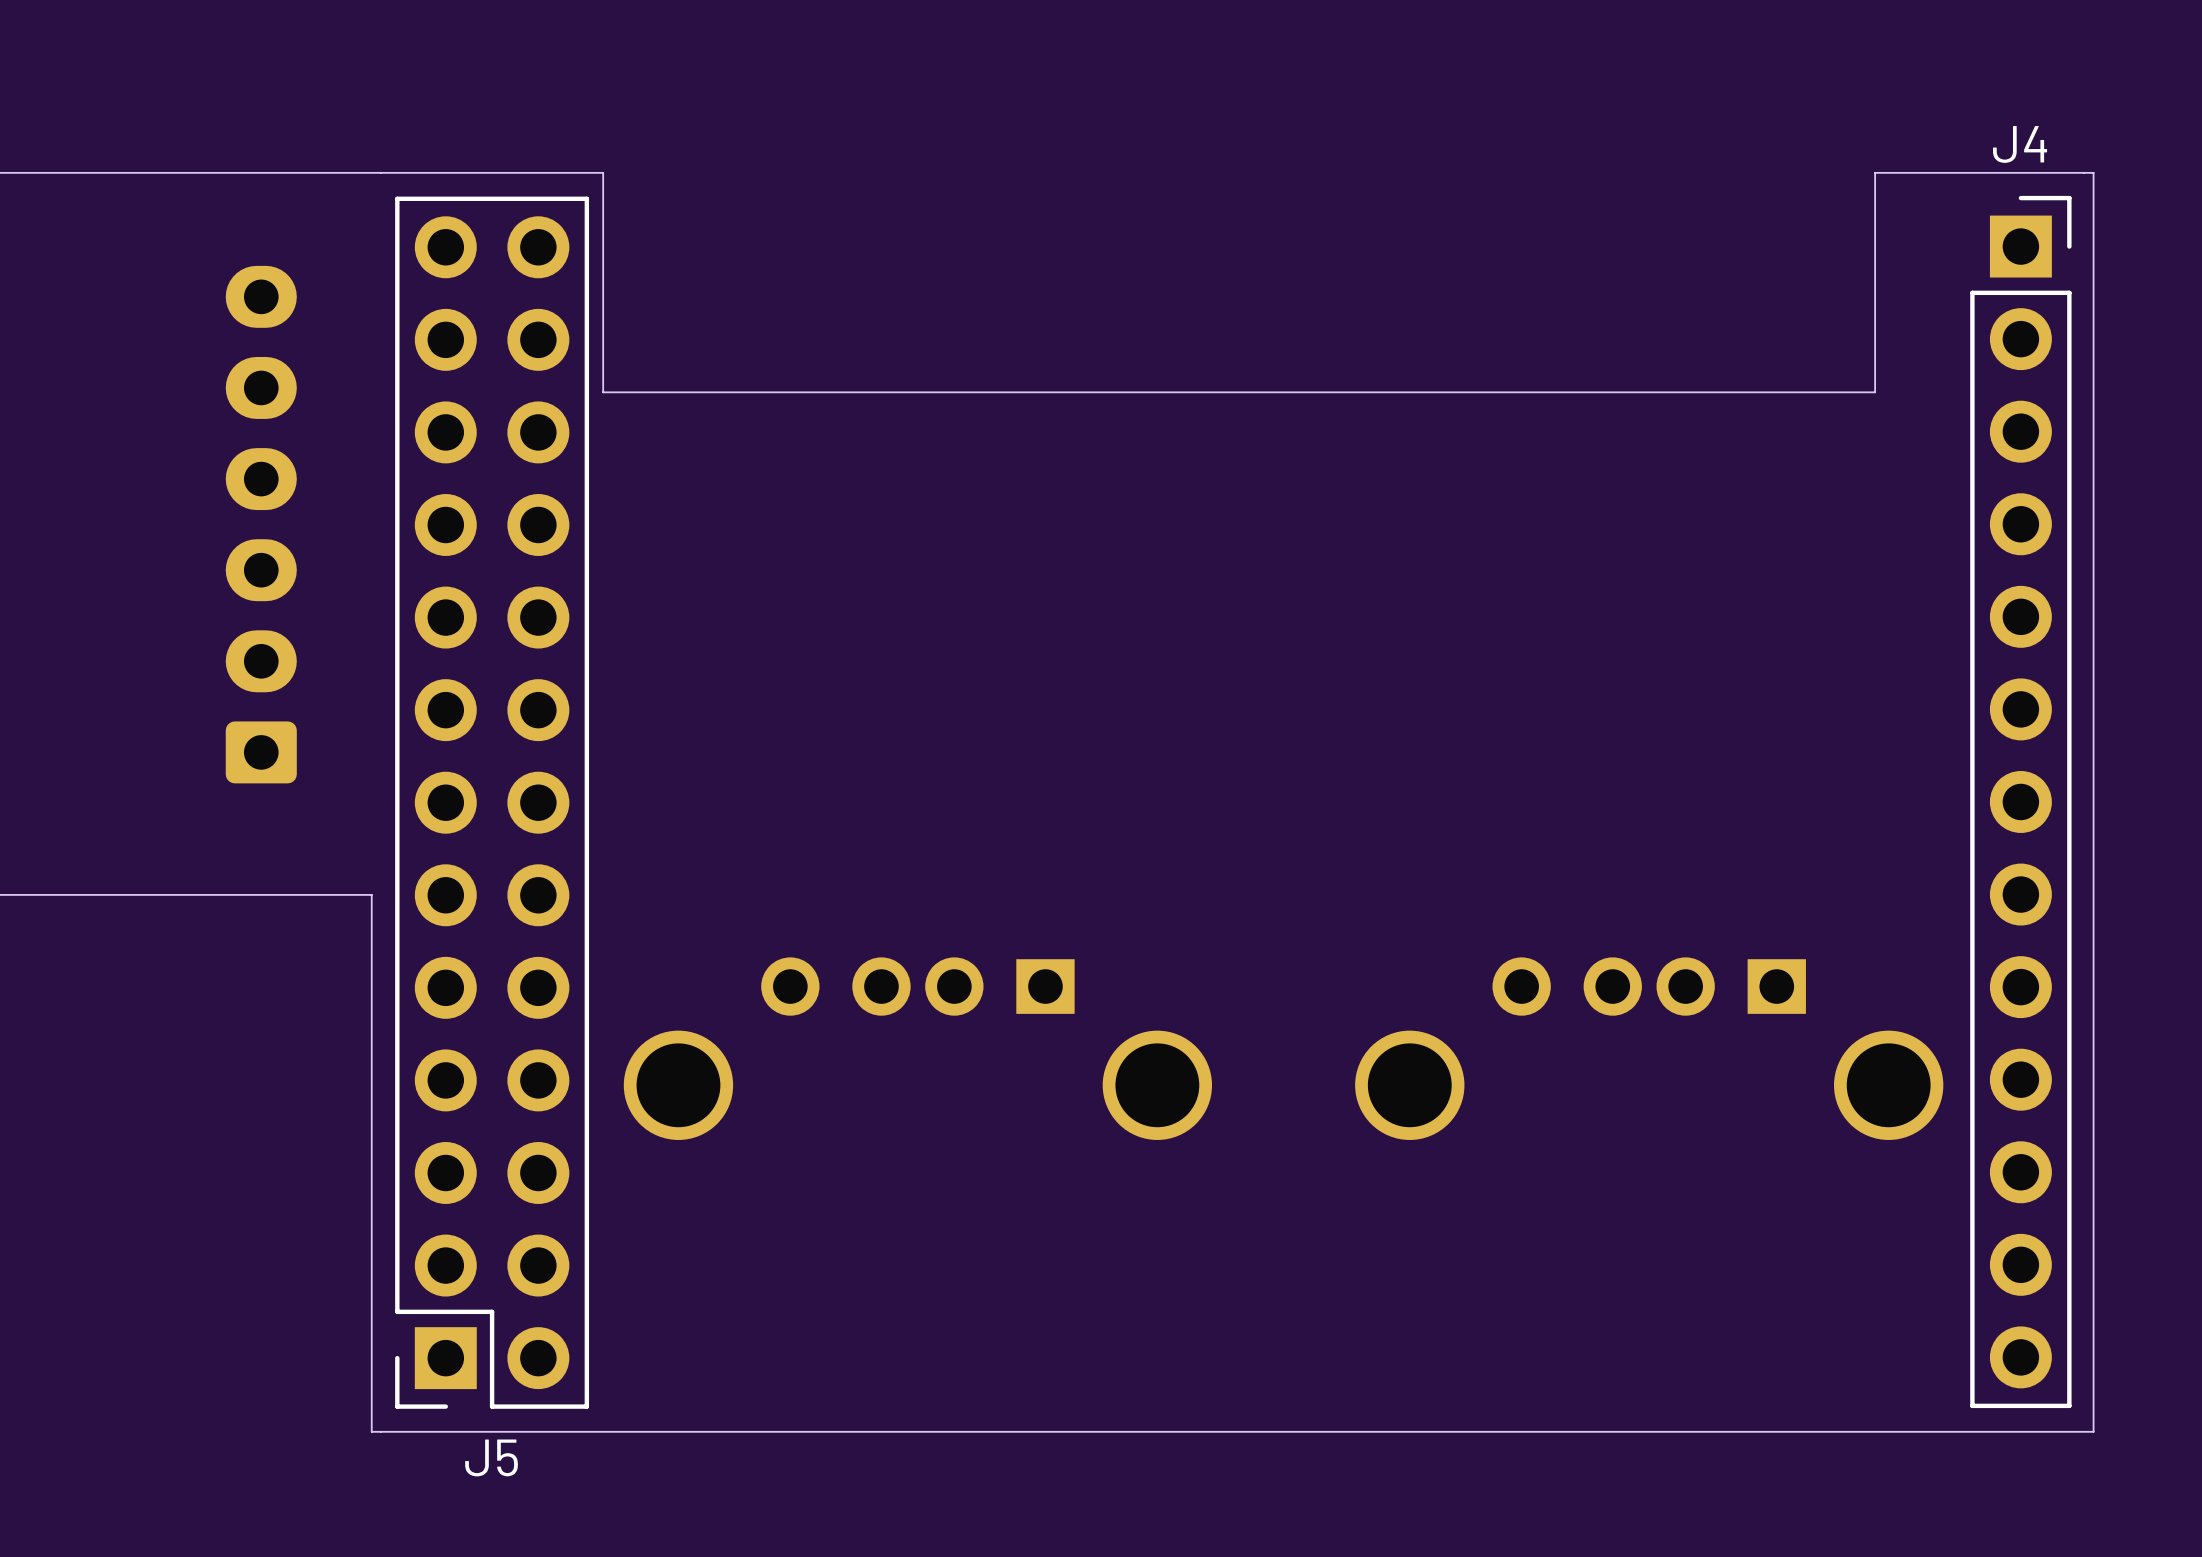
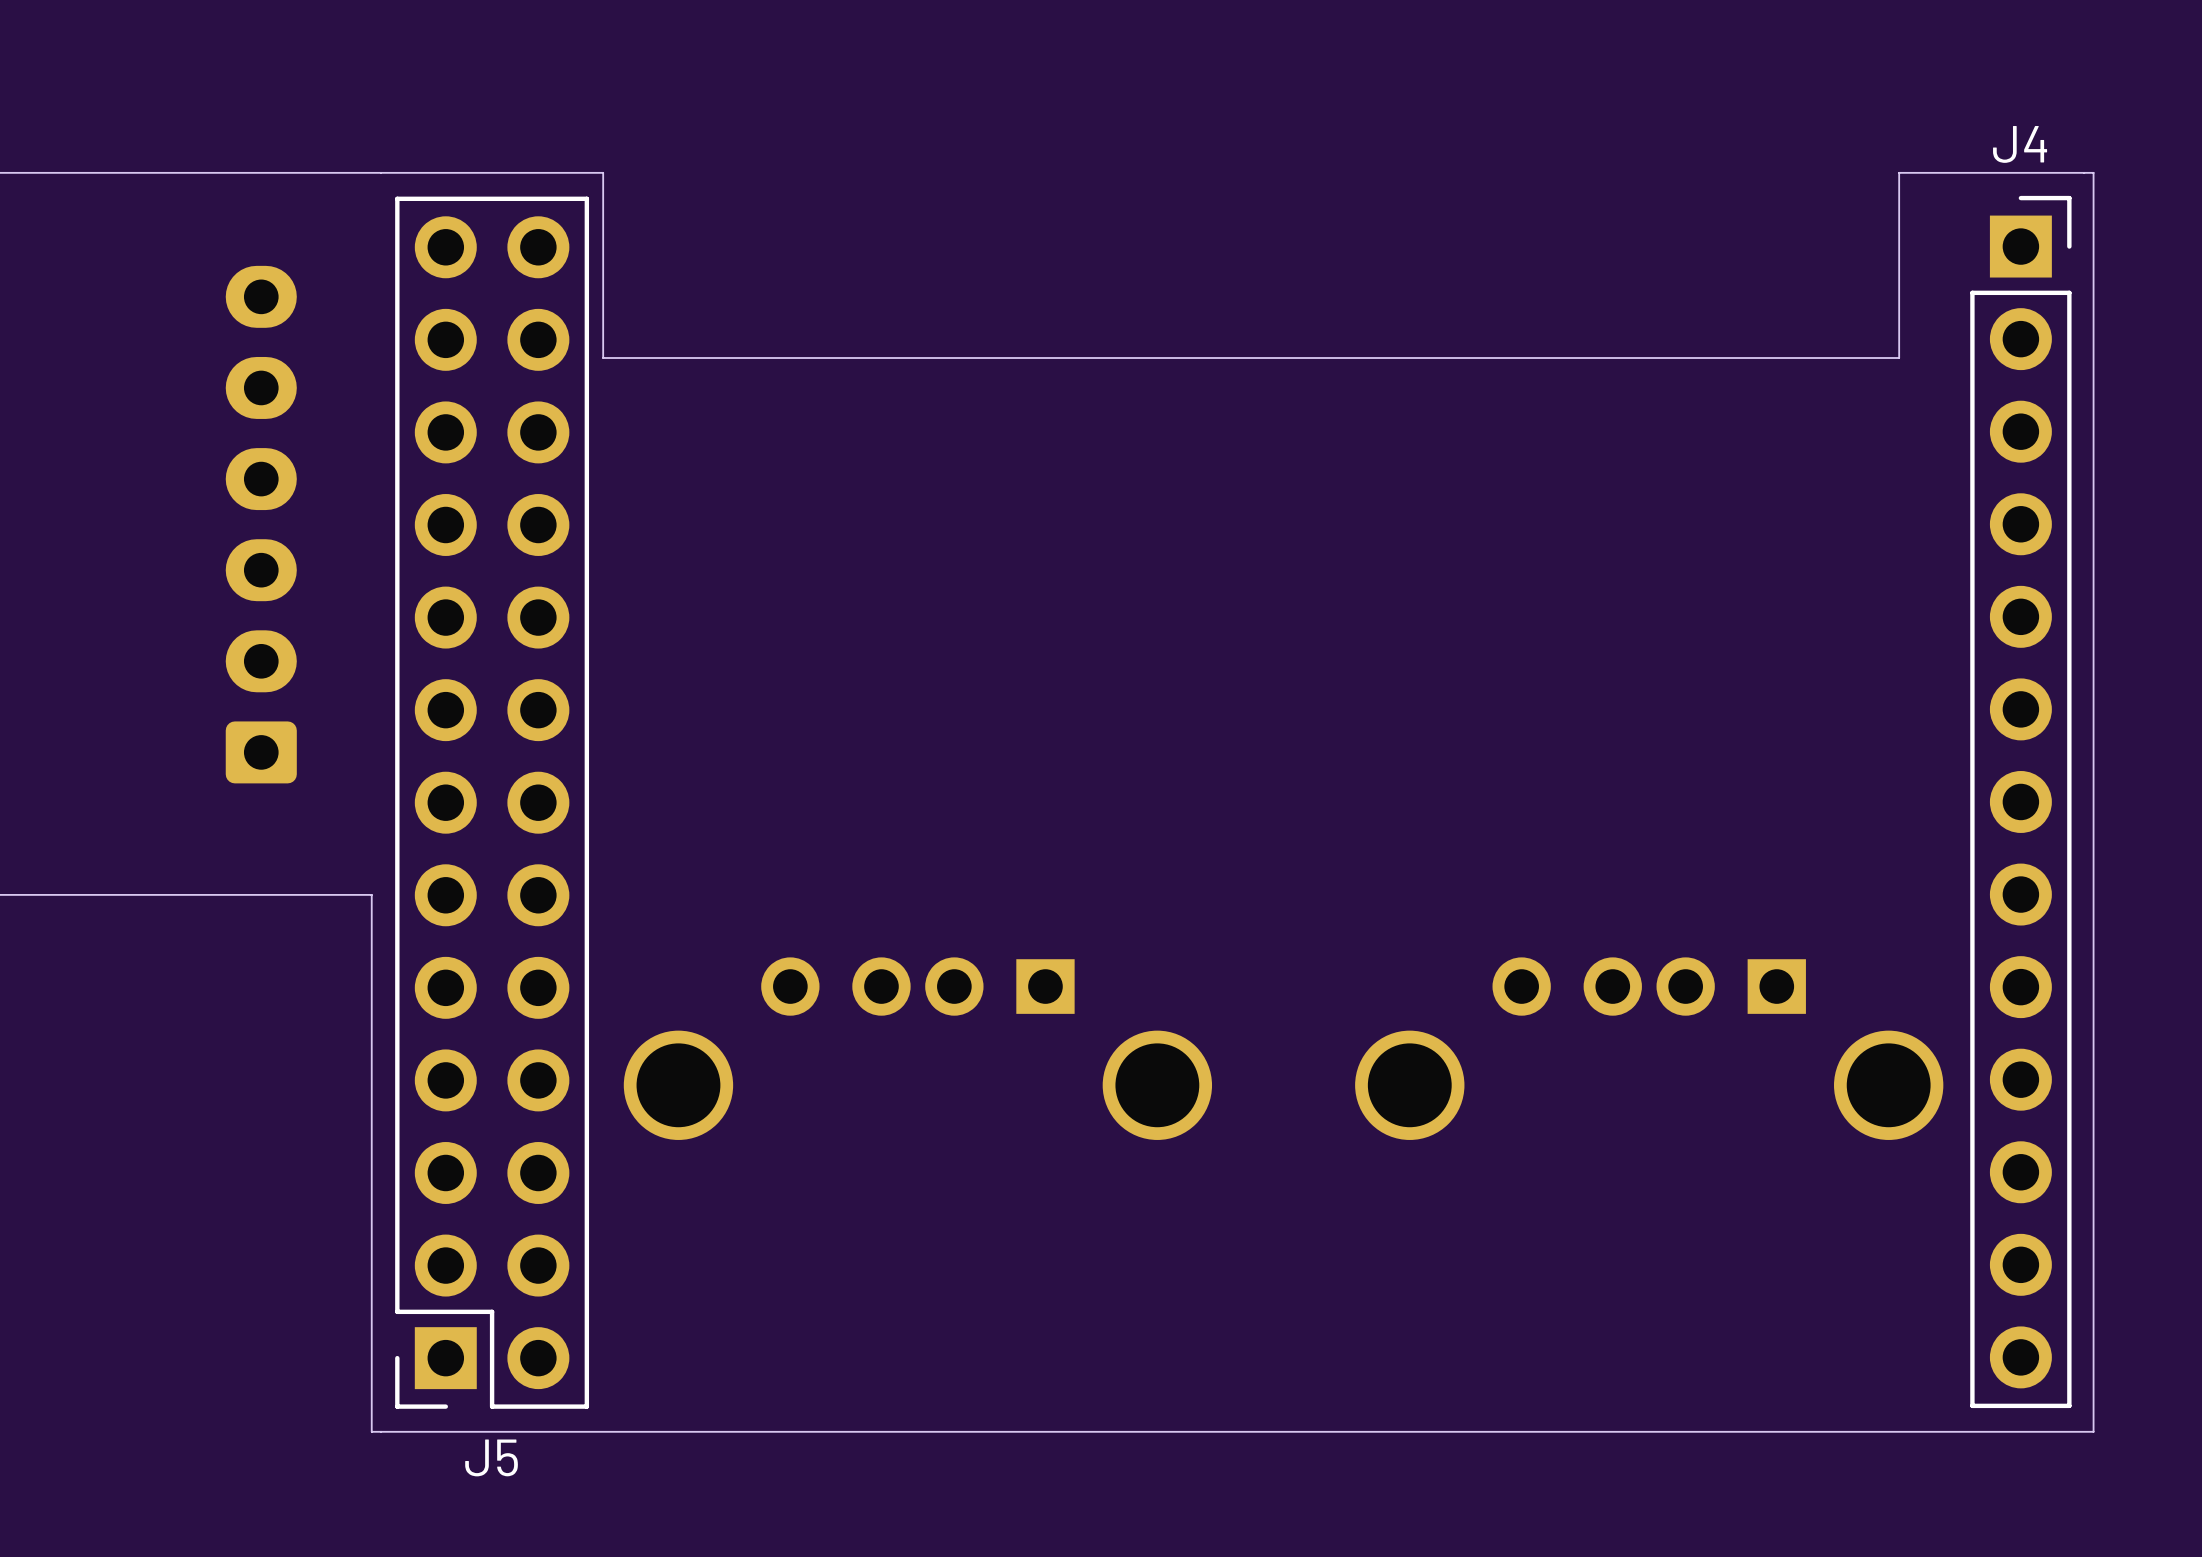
board edge: (1899, 172) (1875, 172) (1875, 392) (603, 392) (603, 358) -> (1899, 172) (1899, 358) (603, 358)

